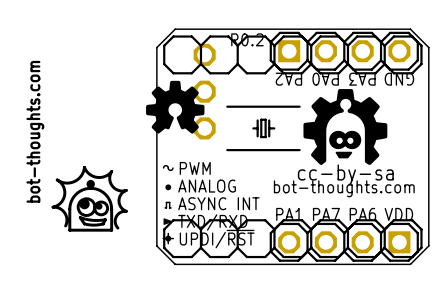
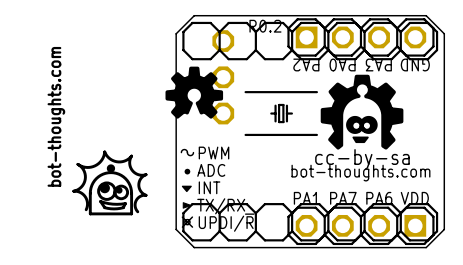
drawing shape: [162, 161, 260, 249] -> [180, 146, 255, 232]

